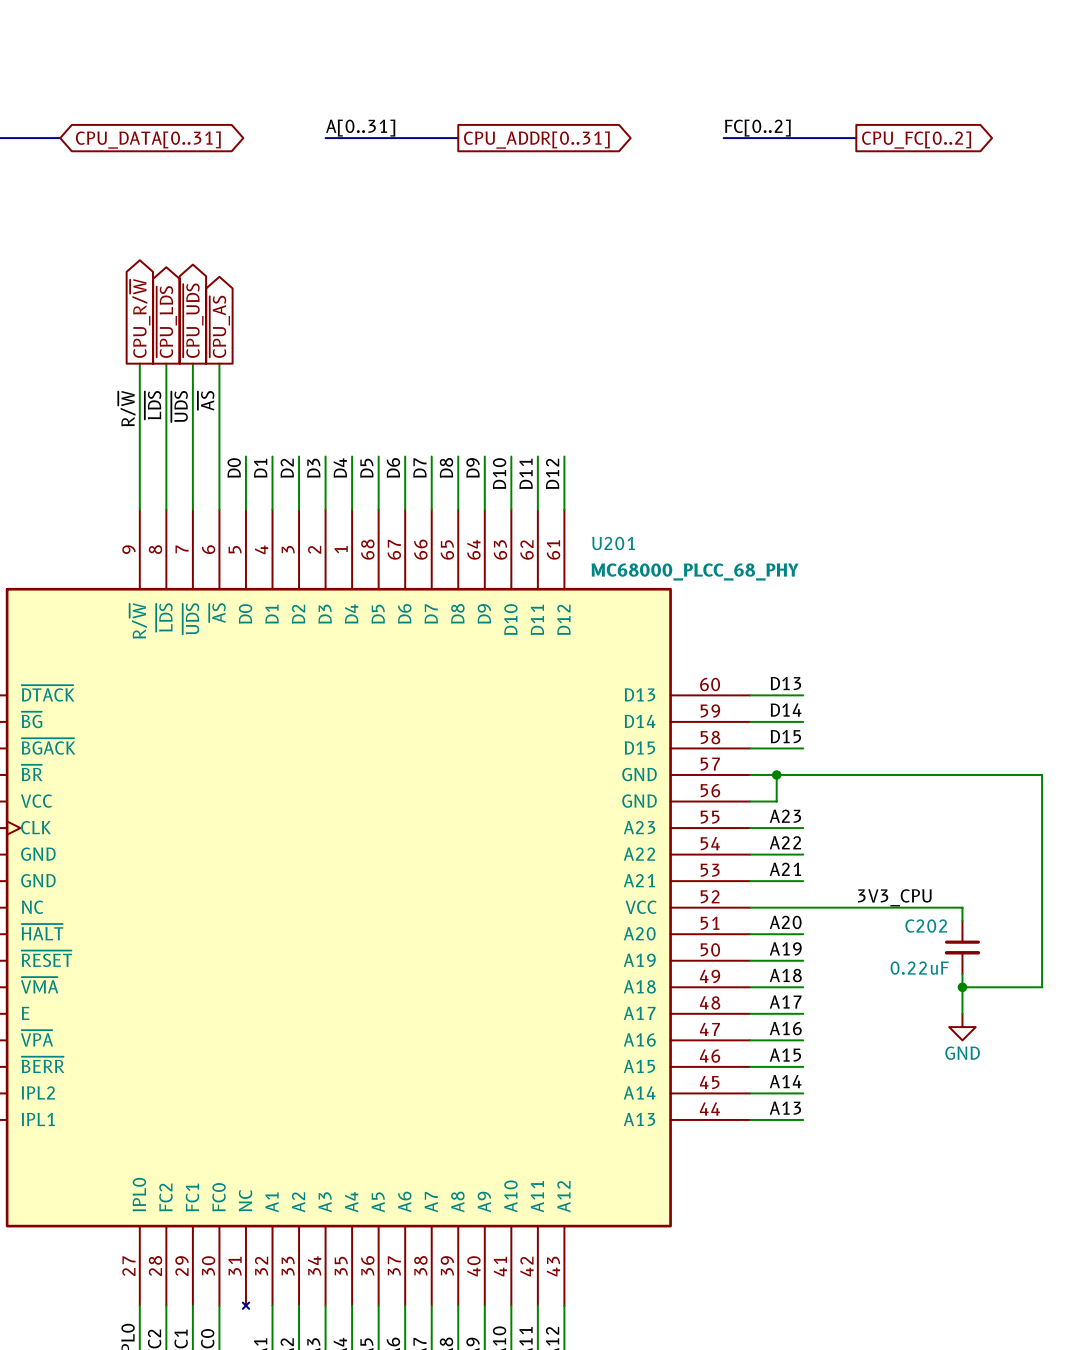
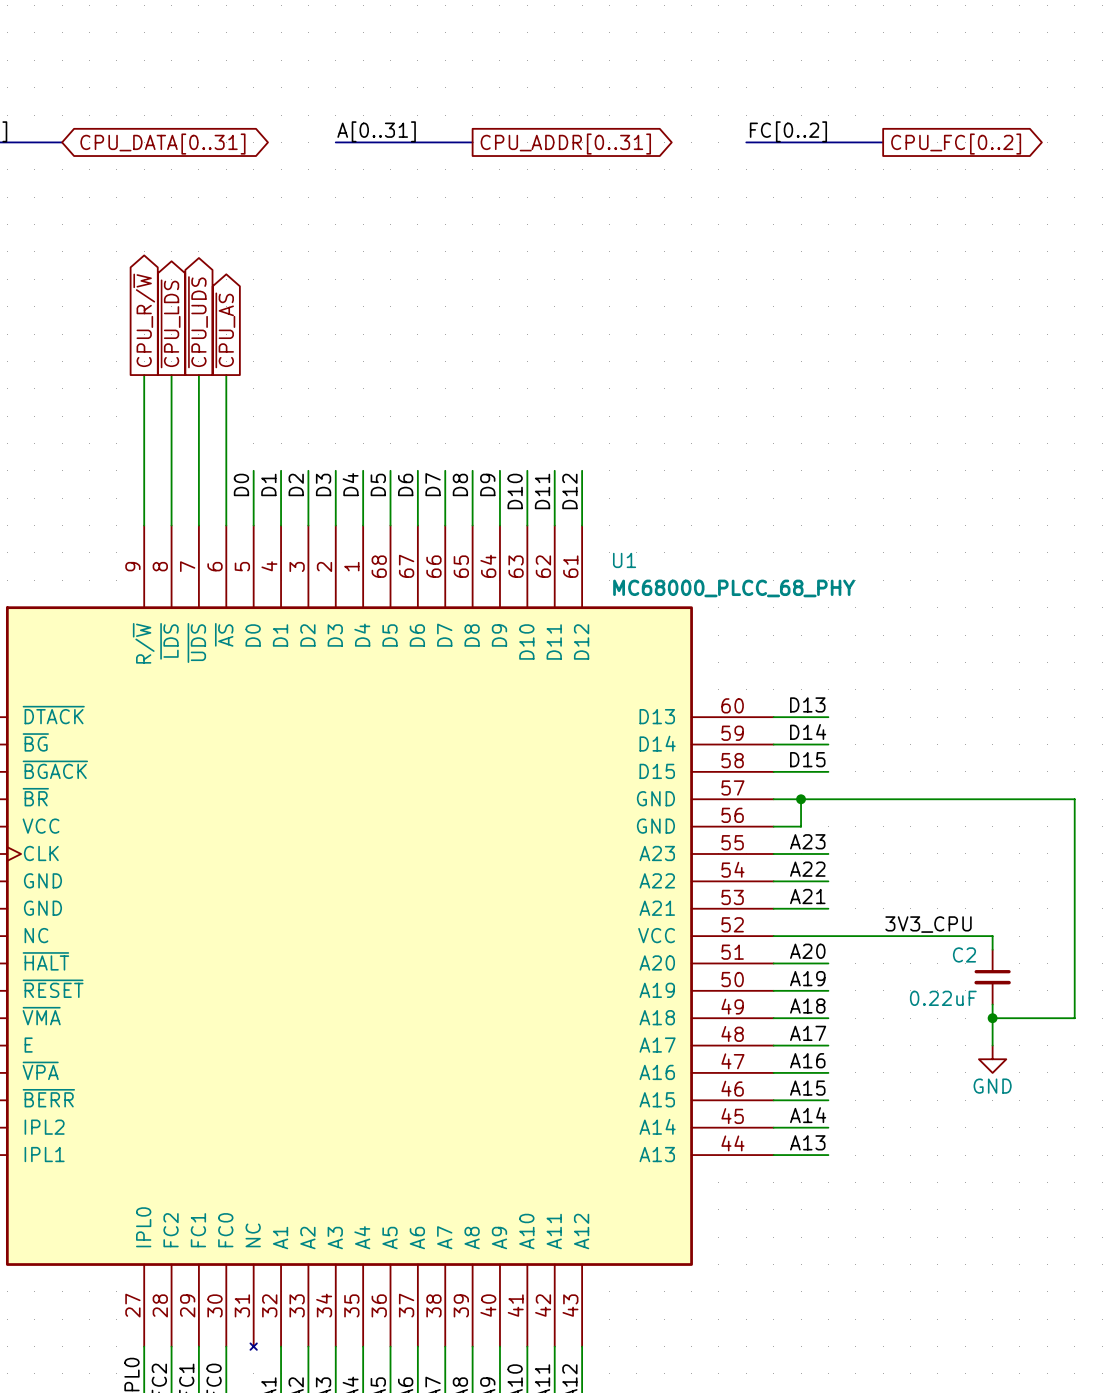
label: ~{AS} (206, 400) -> none
label: ~{LDS} (153, 405) -> none
label: ~{UDS} (179, 406) -> none
label: R/~{W} (126, 408) -> none
U201 name: U201 (613, 543) -> U1 (624, 560)
C202 name: C202 (926, 926) -> C2 (964, 954)

